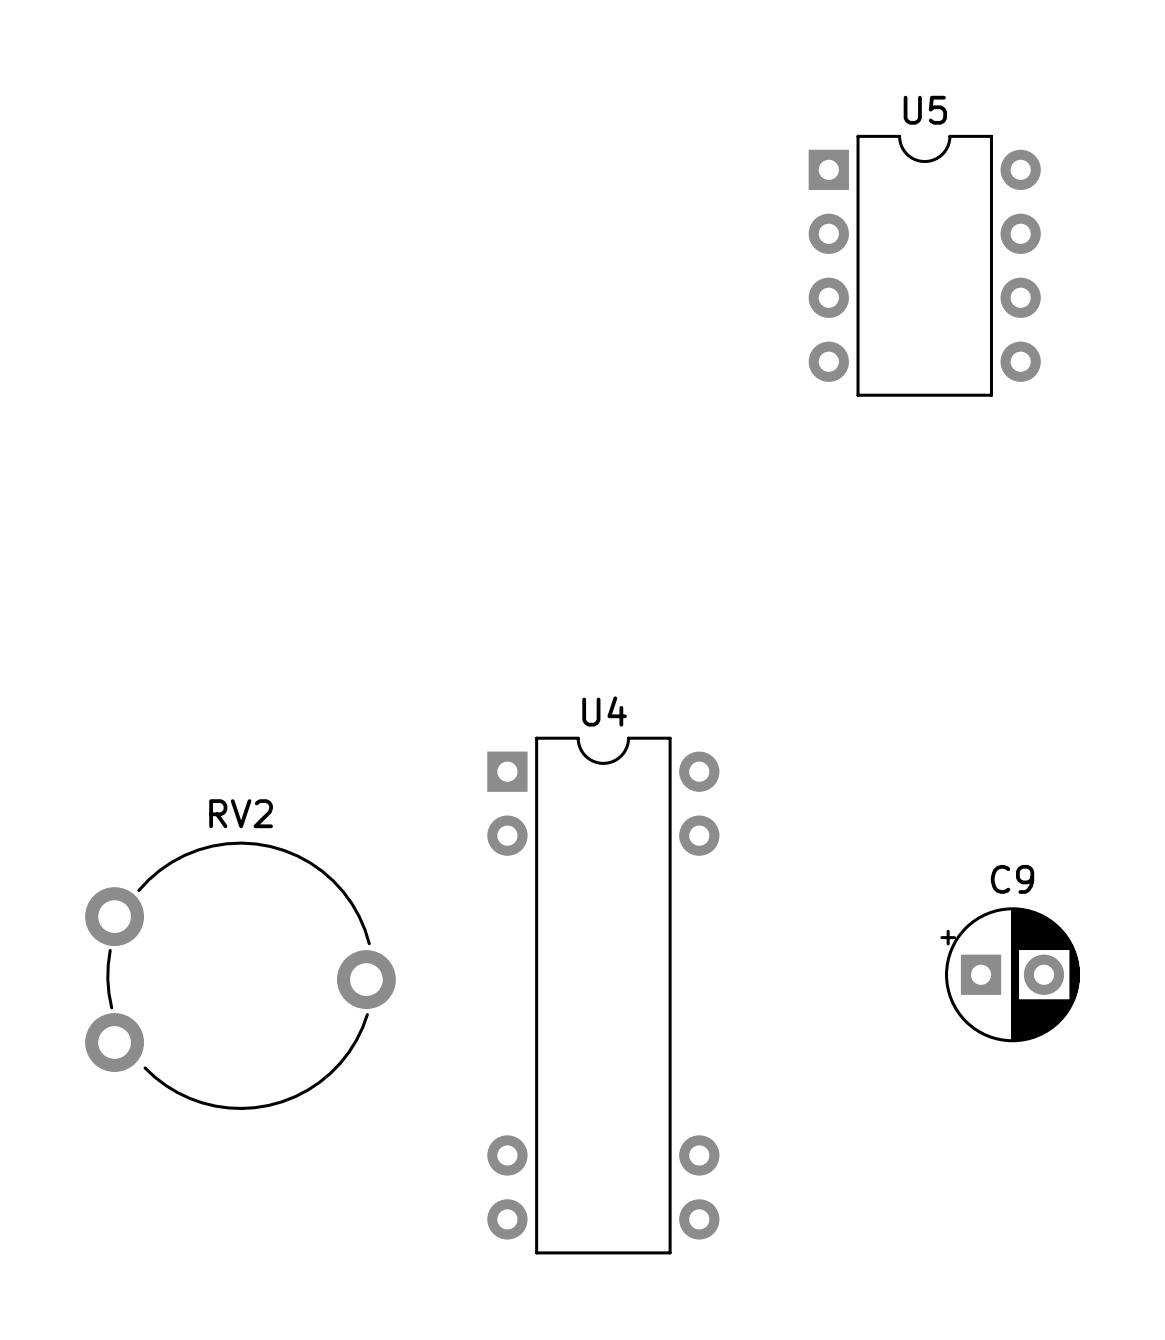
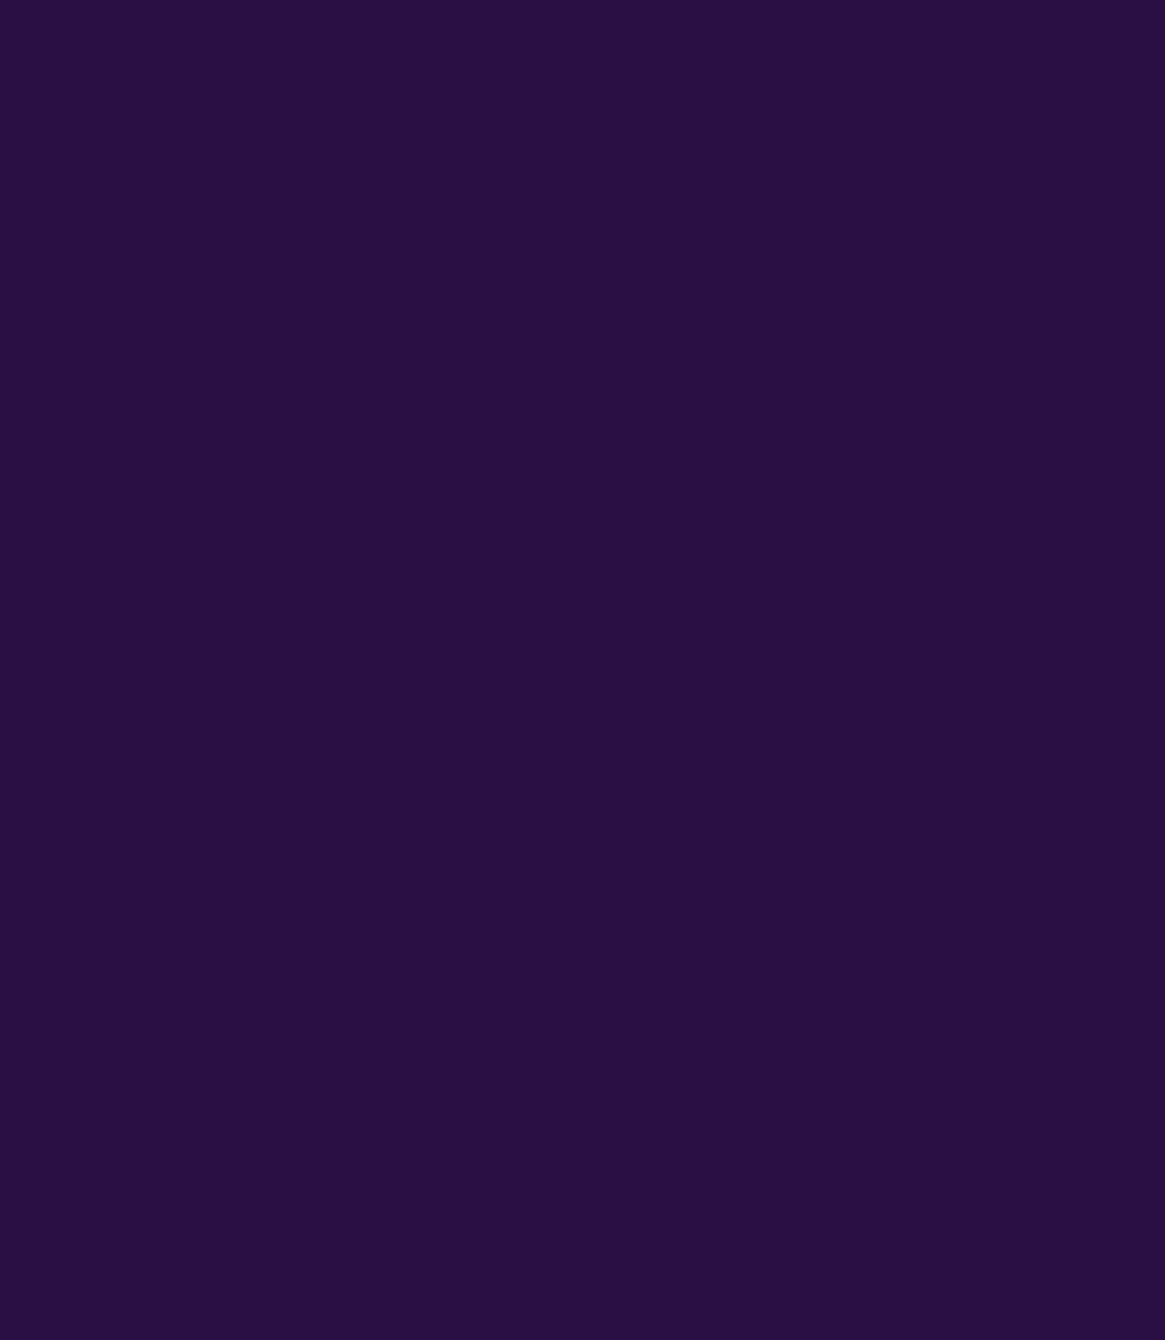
U5: (924, 265) -> none
C9: (1010, 974) -> none
RV2: (240, 975) -> none
U4: (603, 995) -> none

